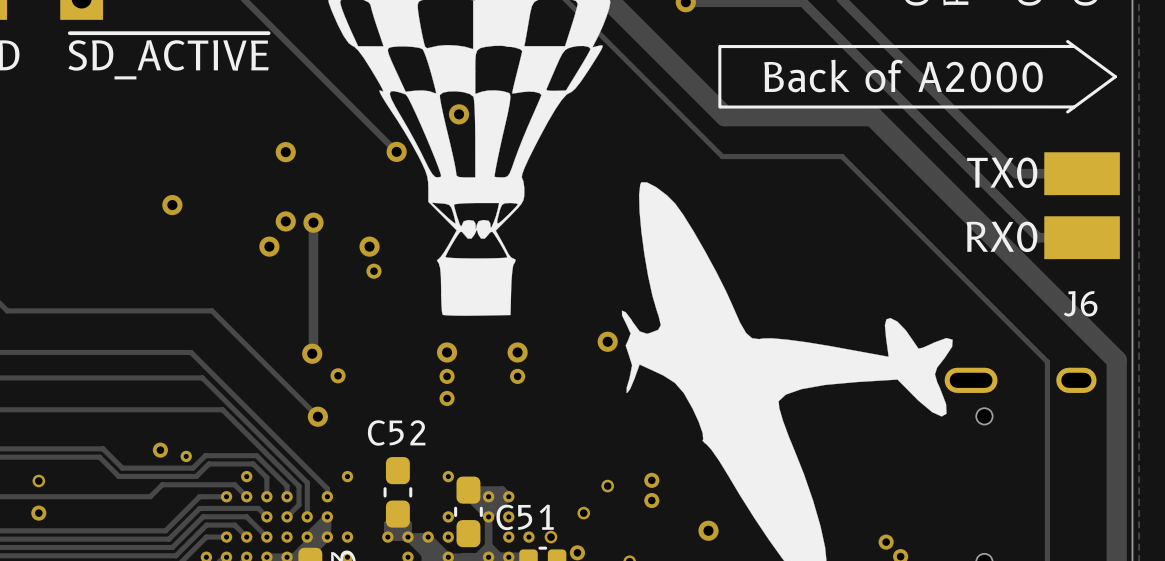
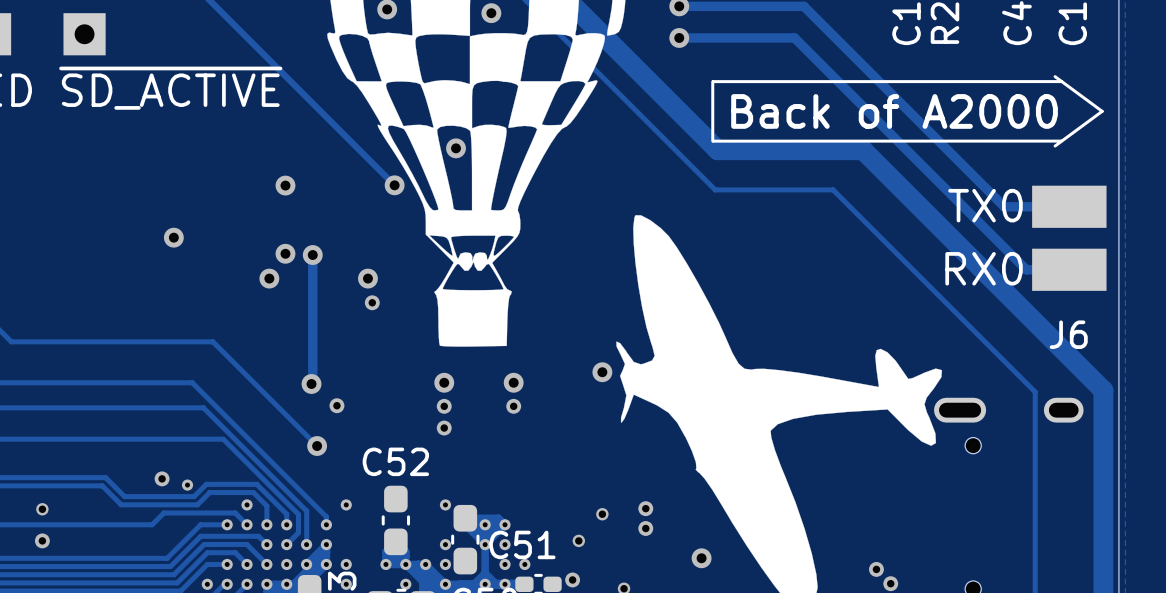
via: (551, 537) -> none

